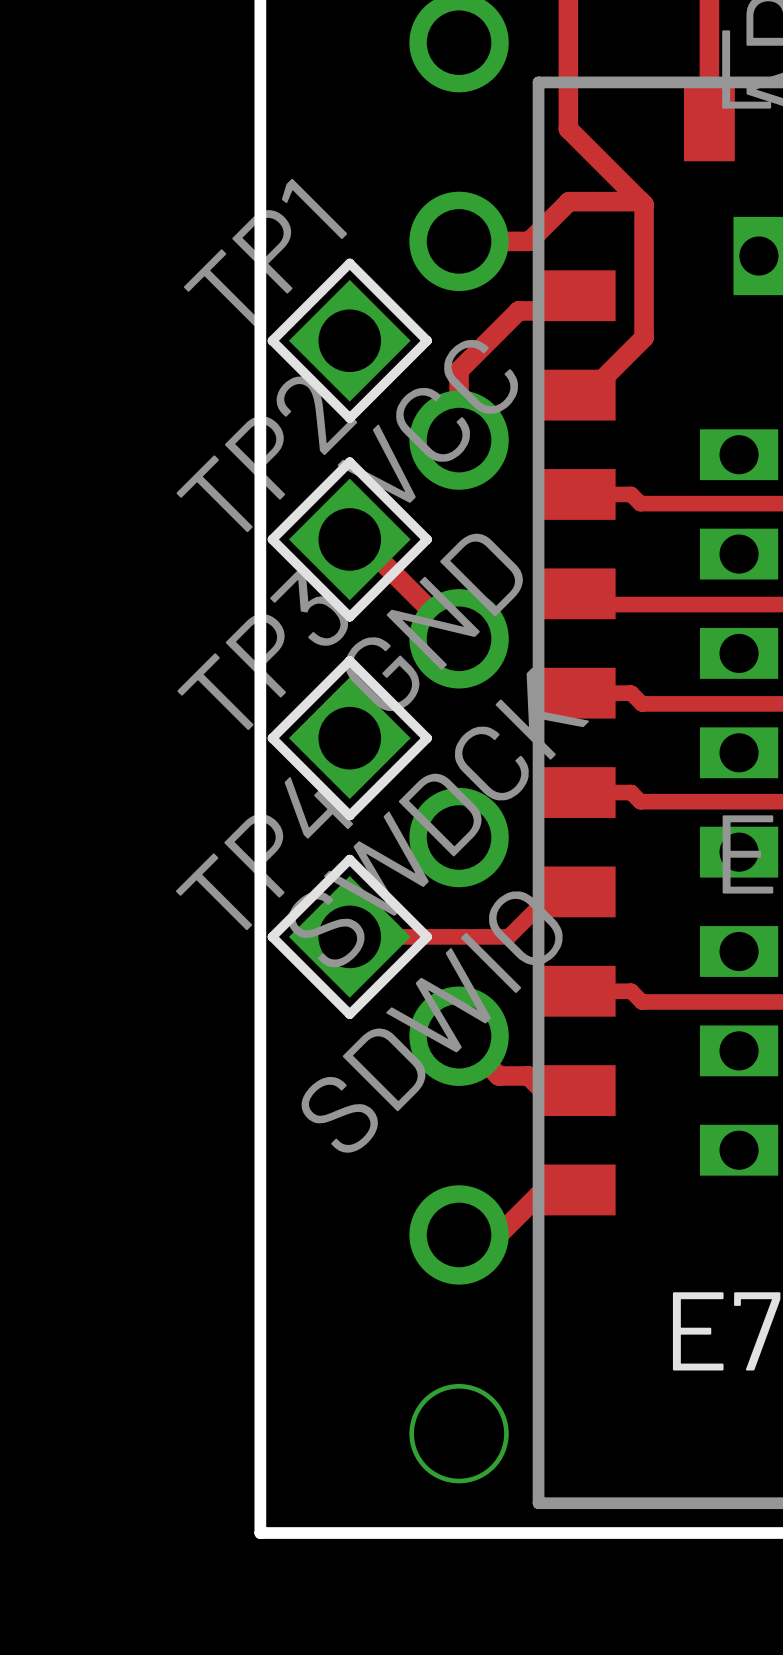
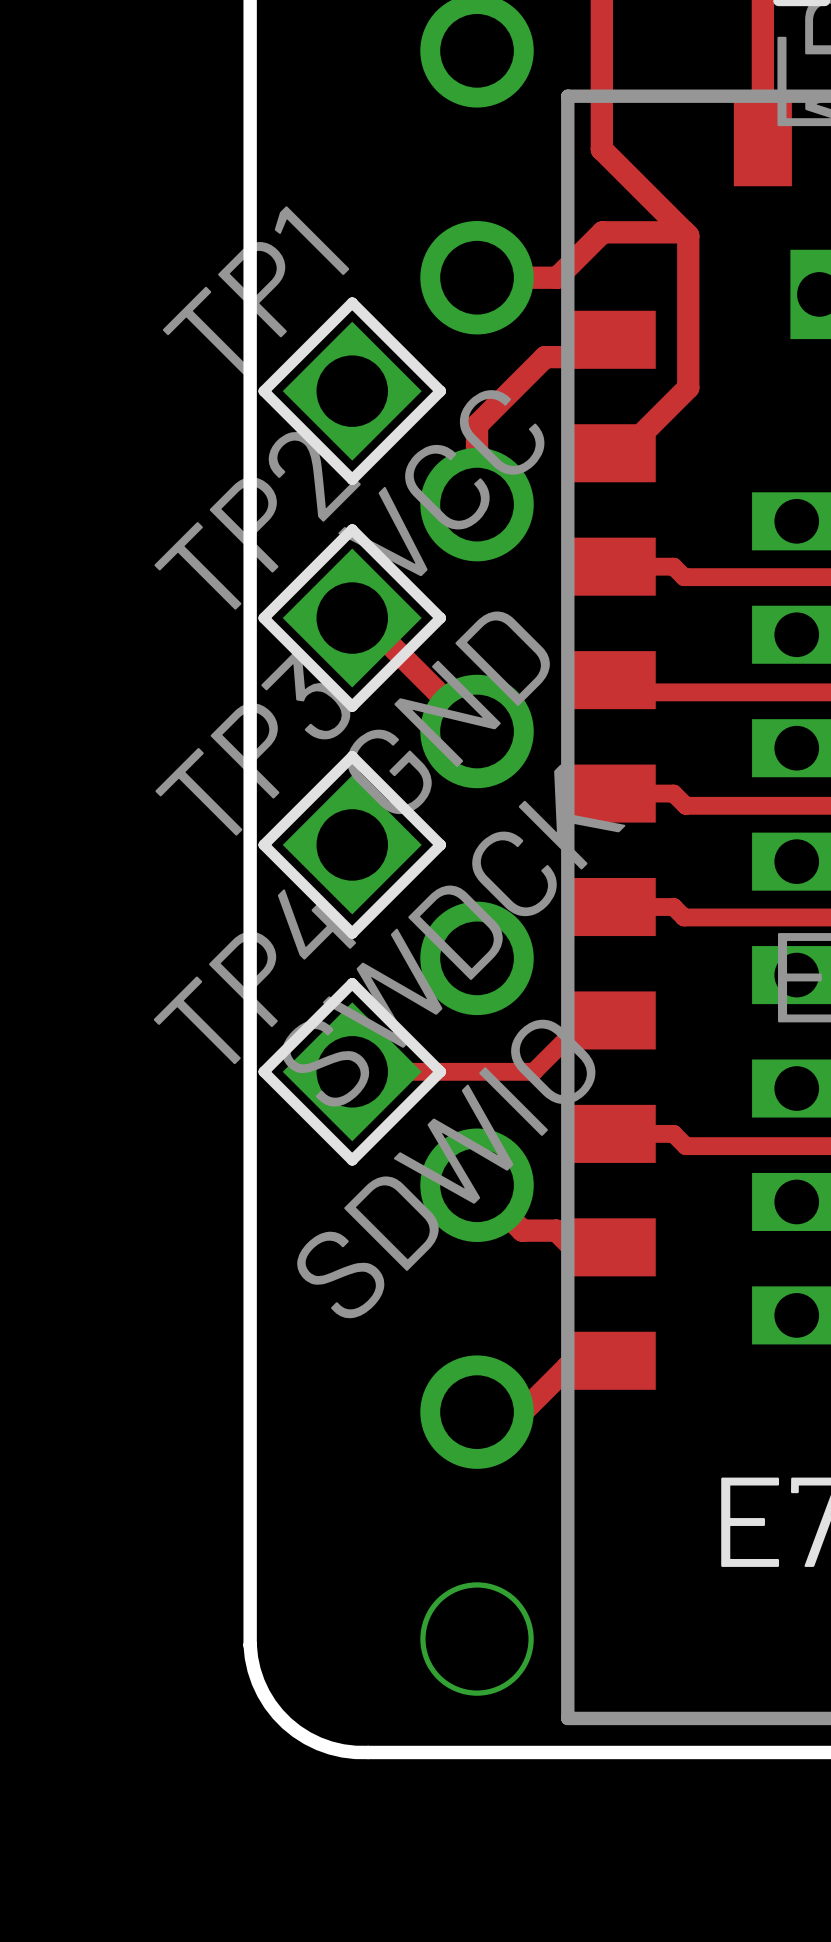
board edge: (260, 1439) (260, 1533) (363, 1533) -> (250, 1645) (258, 1682) (270, 1704) (286, 1723) (307, 1738) (330, 1748) (368, 1752)

